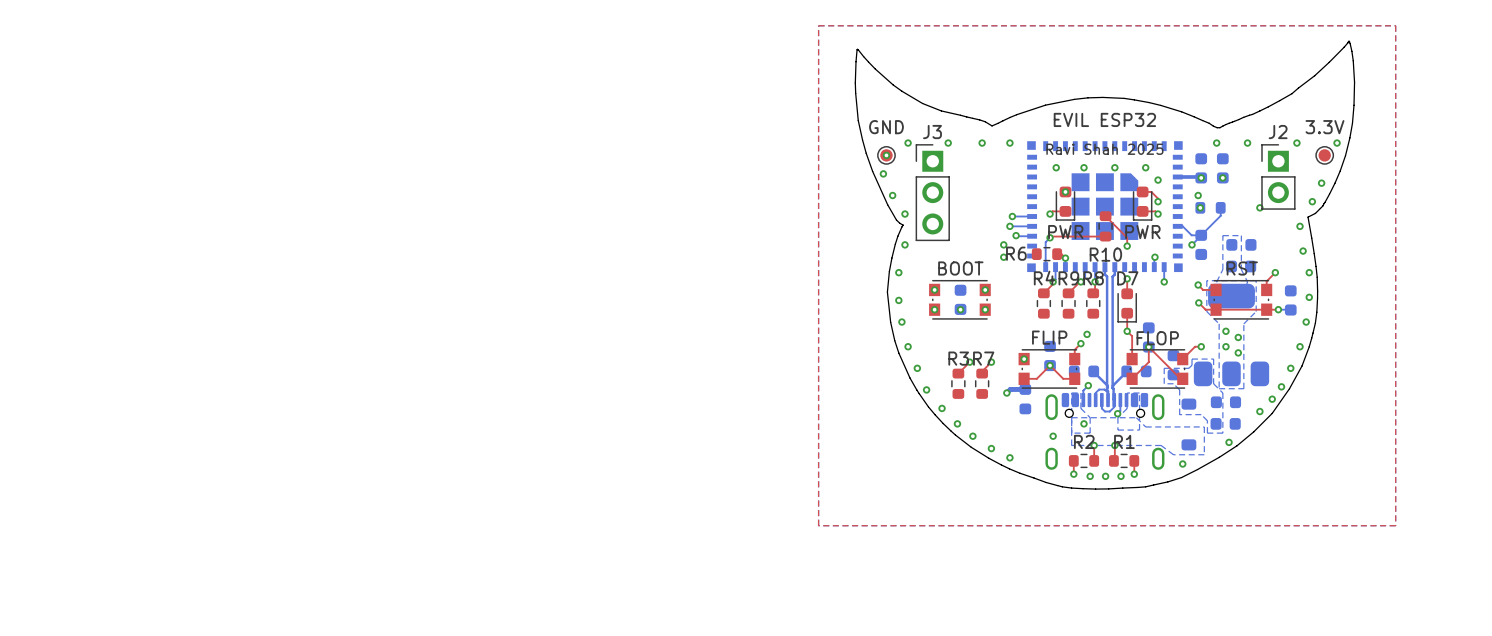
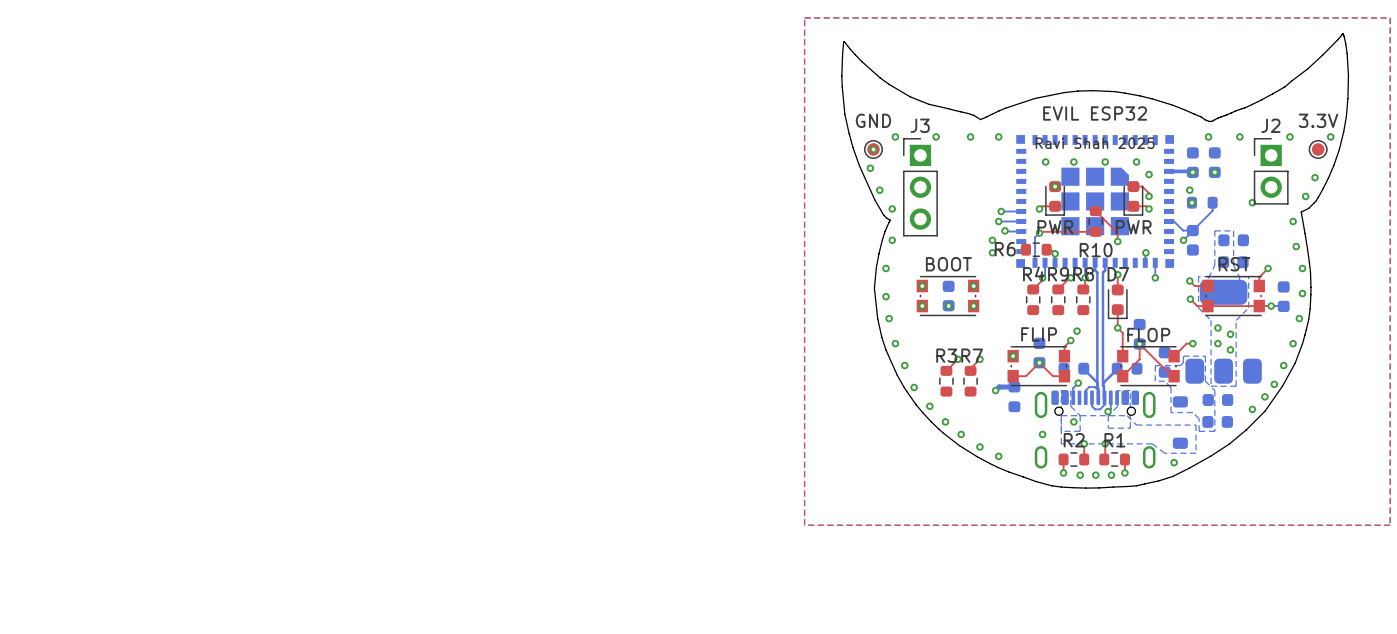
via: (1229, 442) -> none

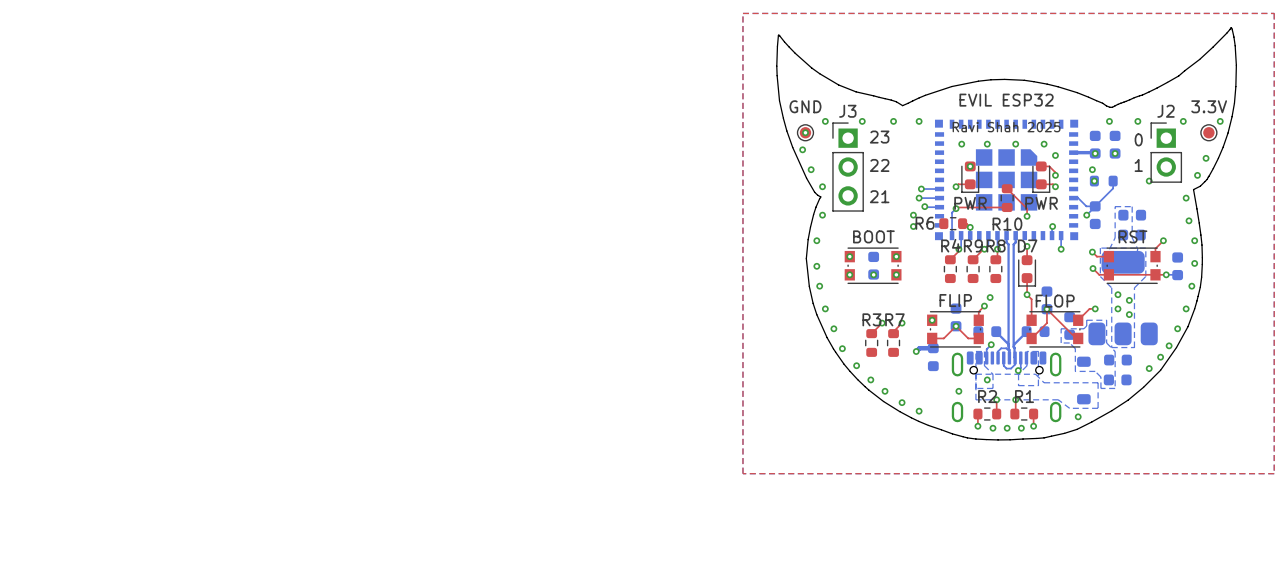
text: none -> 23 (879, 137)
text: none -> 0 (1138, 139)
text: none -> 22 (879, 165)
text: none -> 1 (1138, 165)
text: none -> 21 (879, 196)

